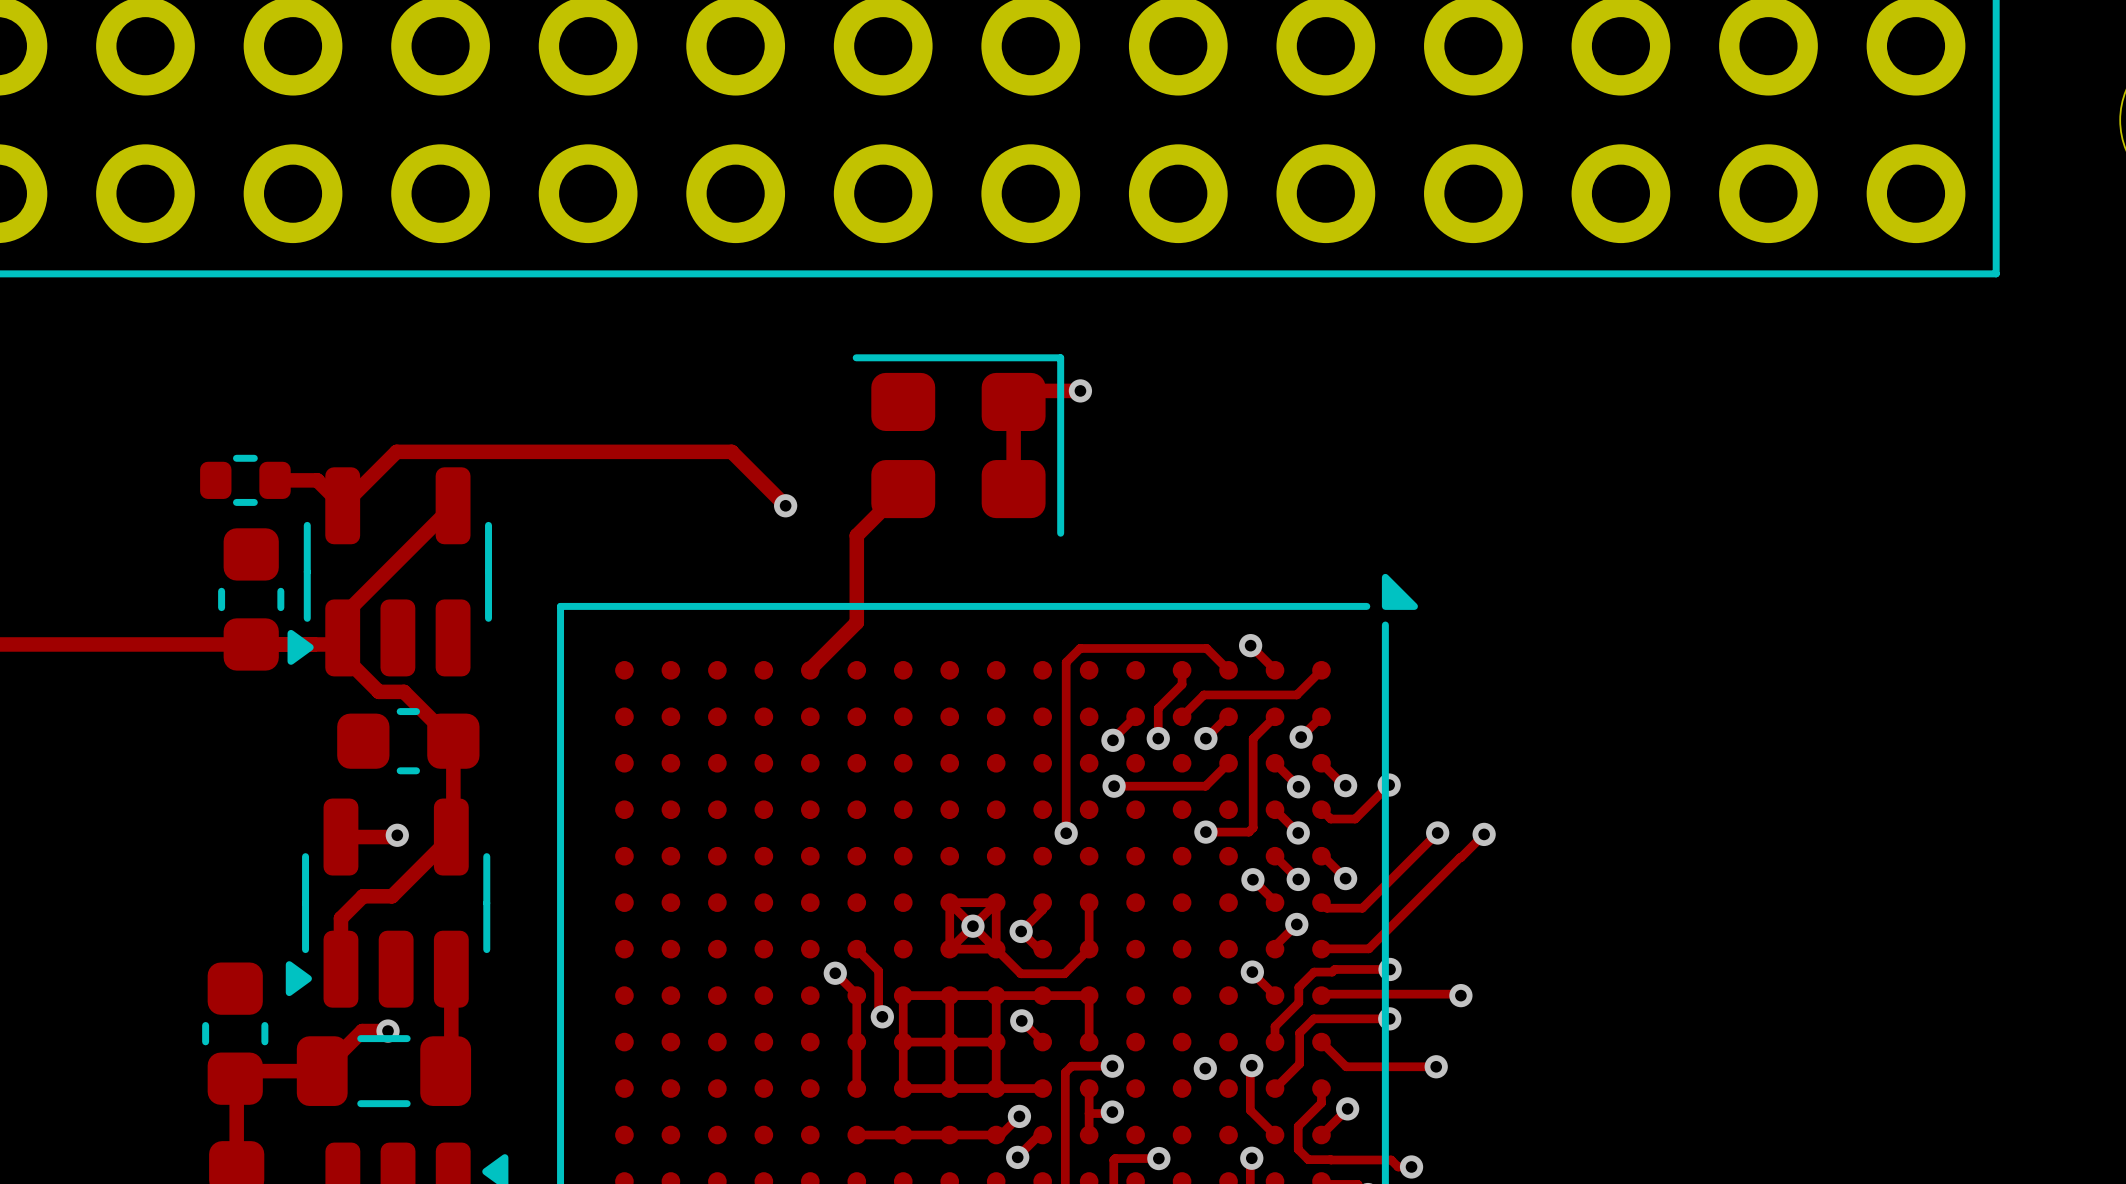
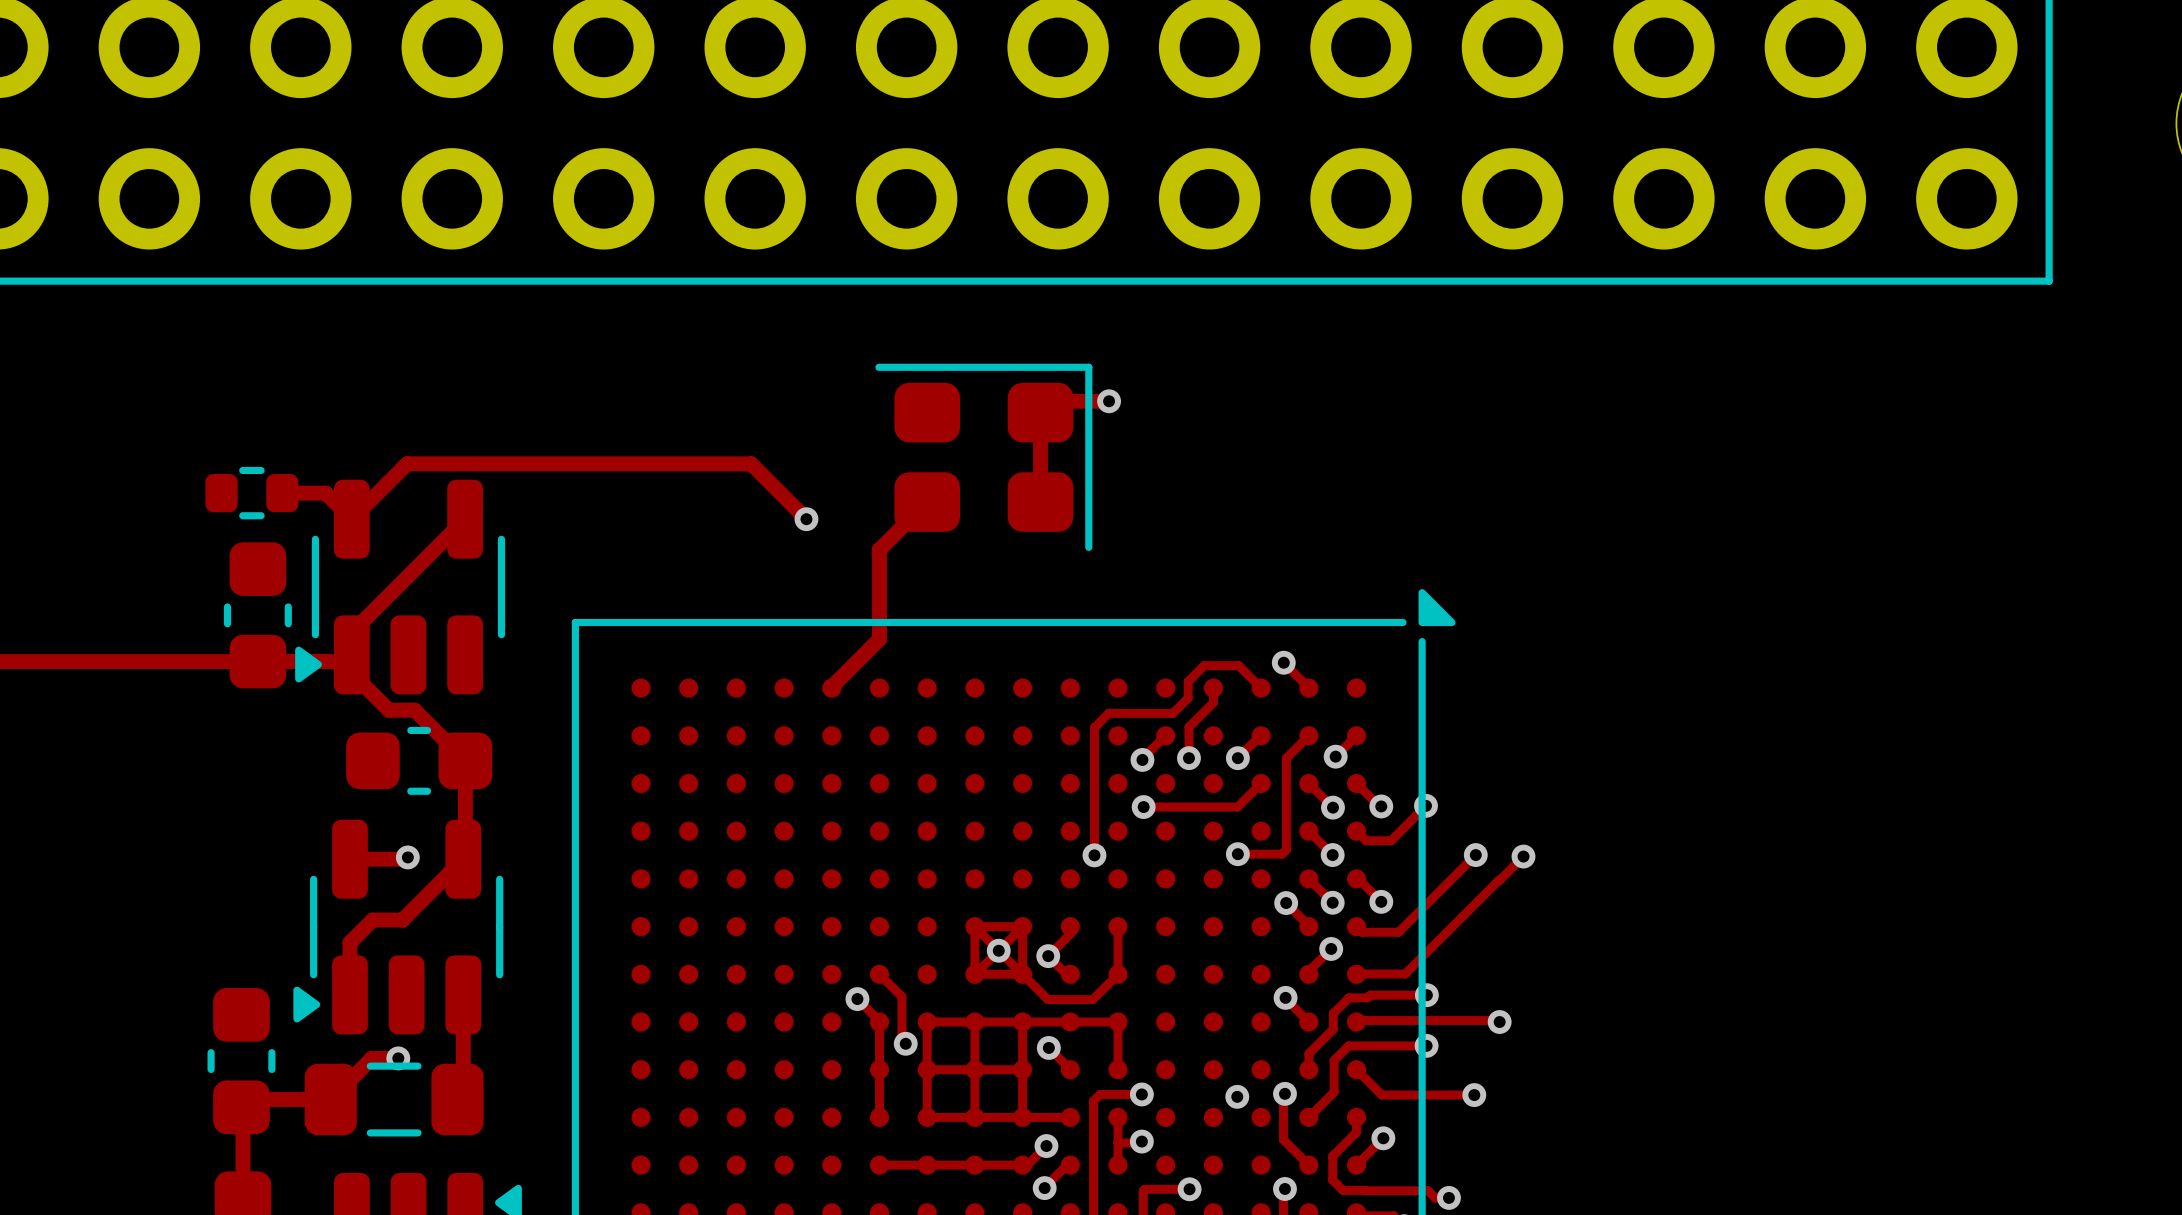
track: (1173, 648) (1080, 648) (1066, 662) (1066, 708) -> (1204, 665) (1188, 681) (1188, 698) (1172, 713) (1108, 713) (1094, 727)
track: (1321, 670) (1296, 694) (1203, 694) (1182, 716) -> none

